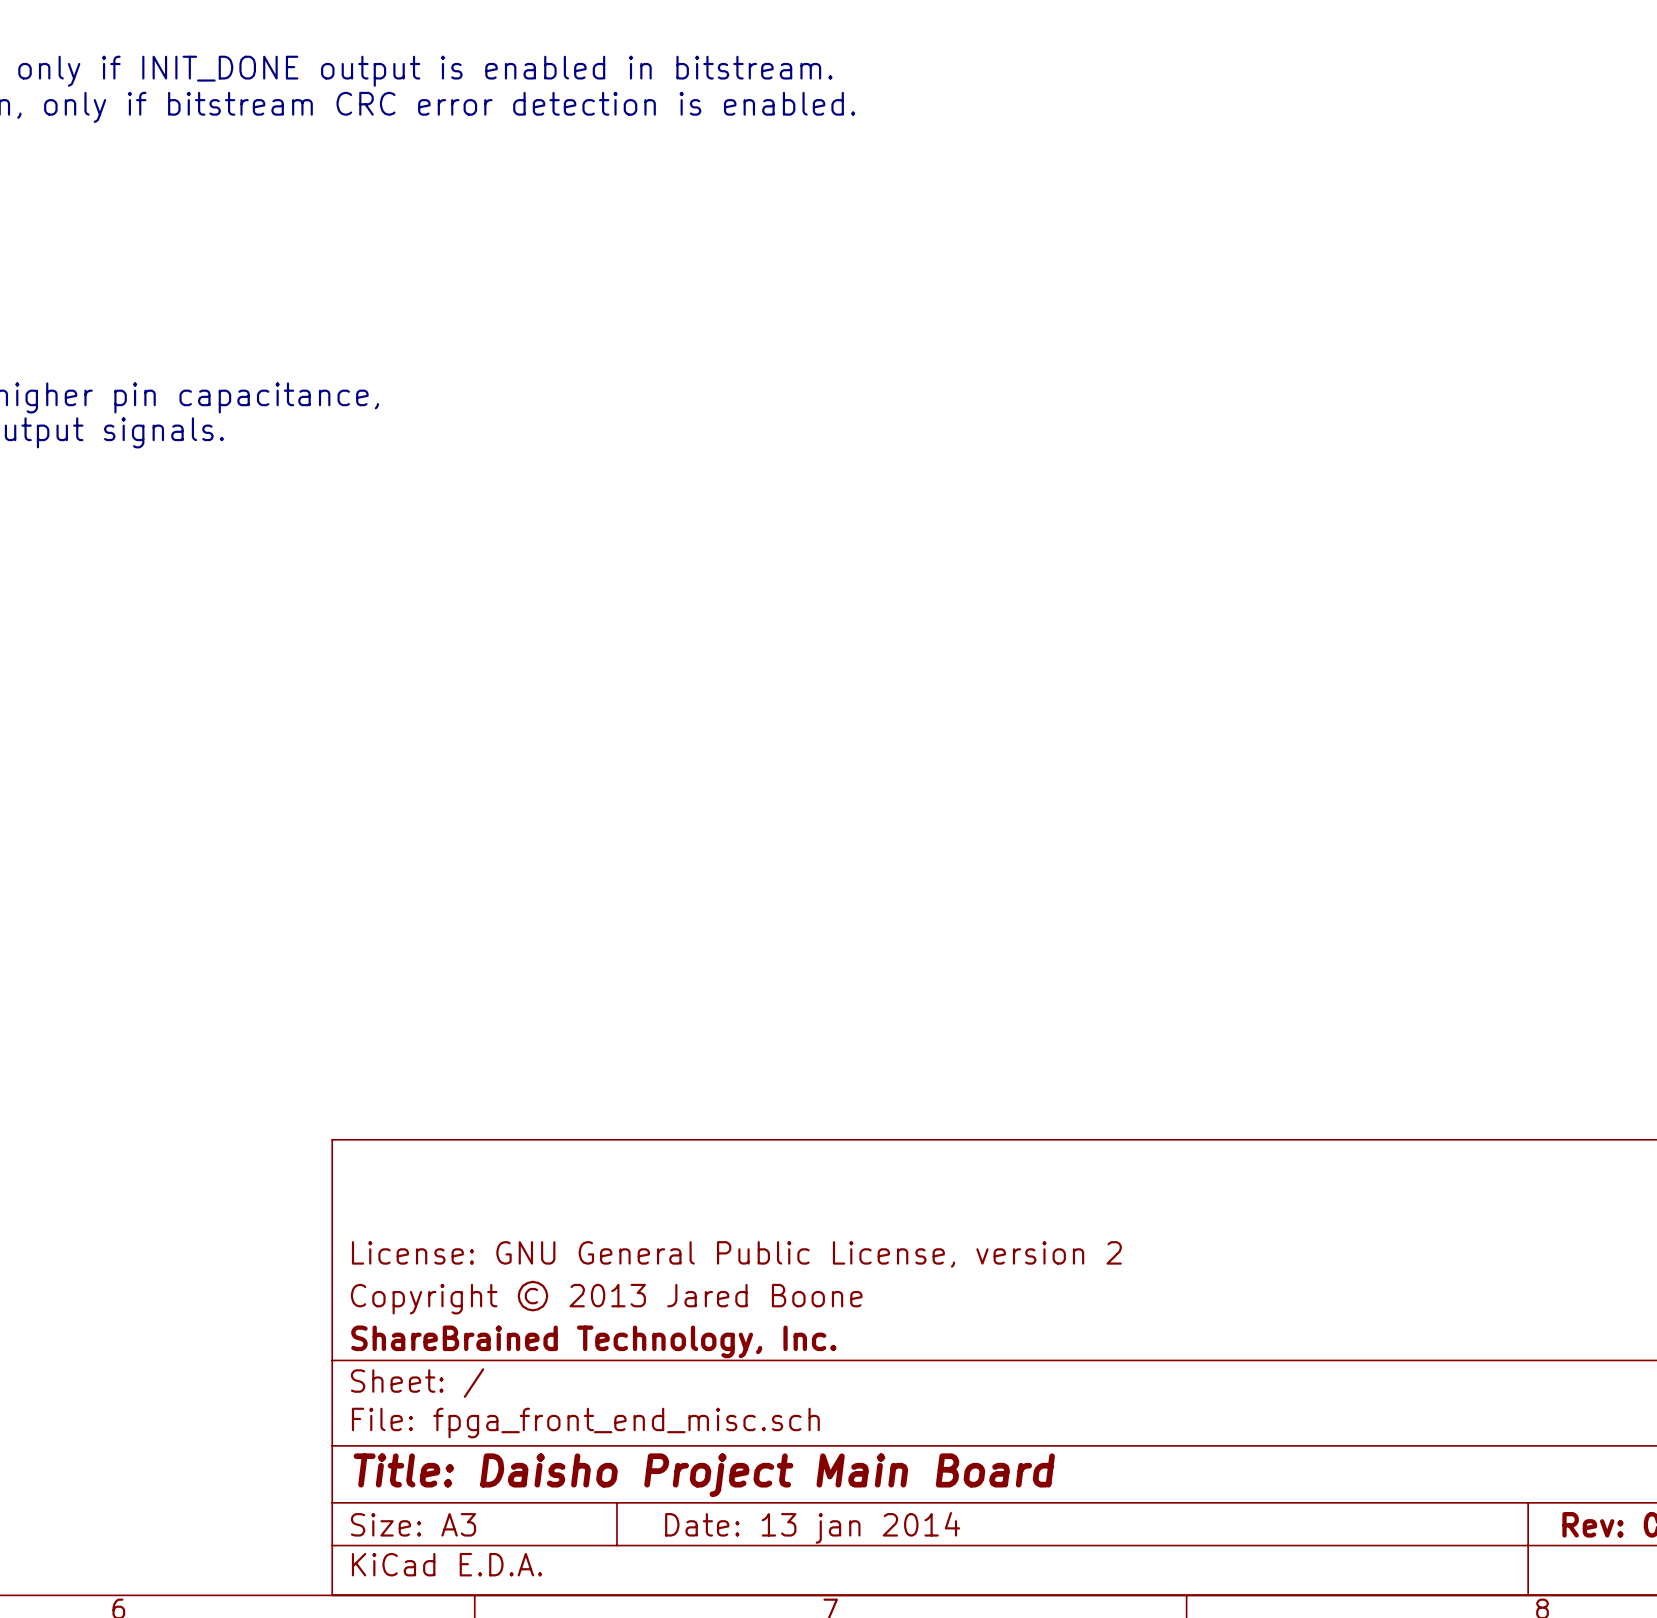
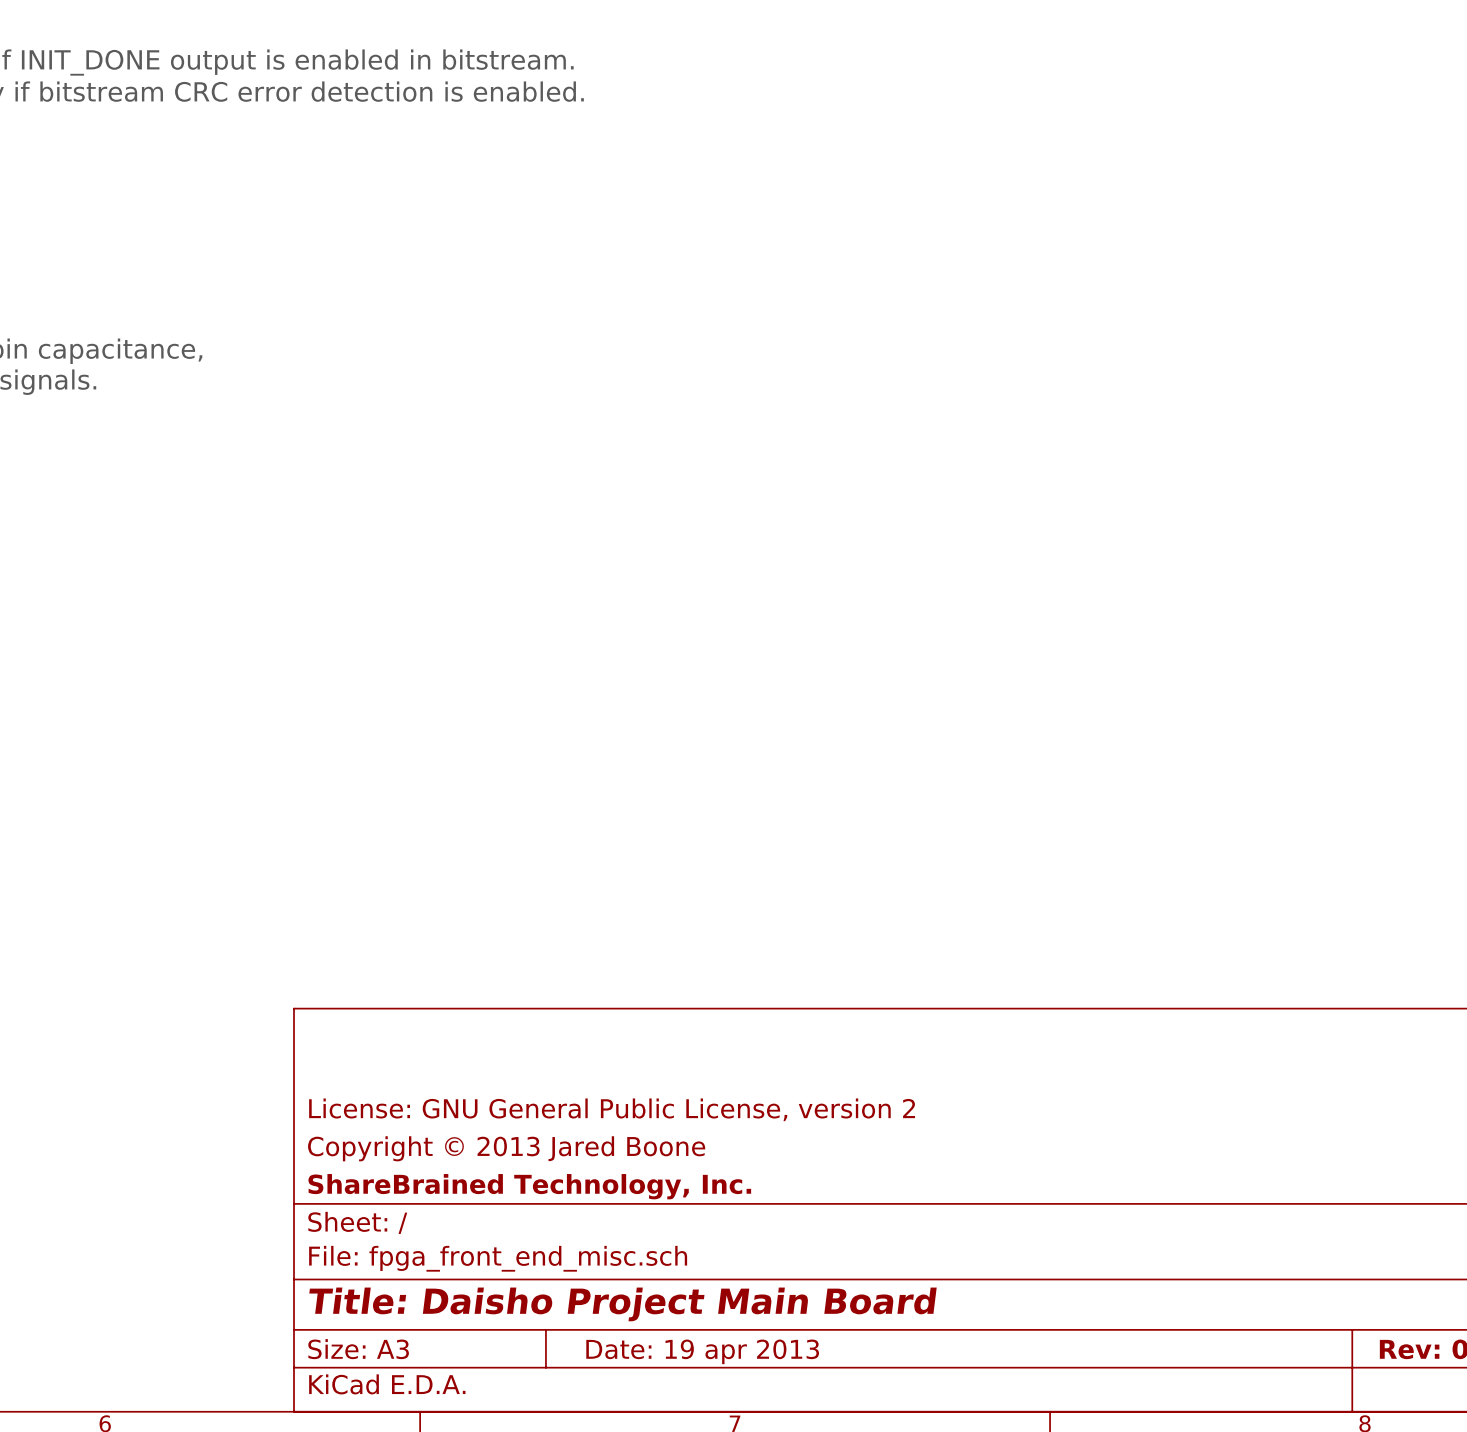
title block: Date: 13 jan 2014 (812, 1527) -> Date: 19 apr 2013 (702, 1351)

